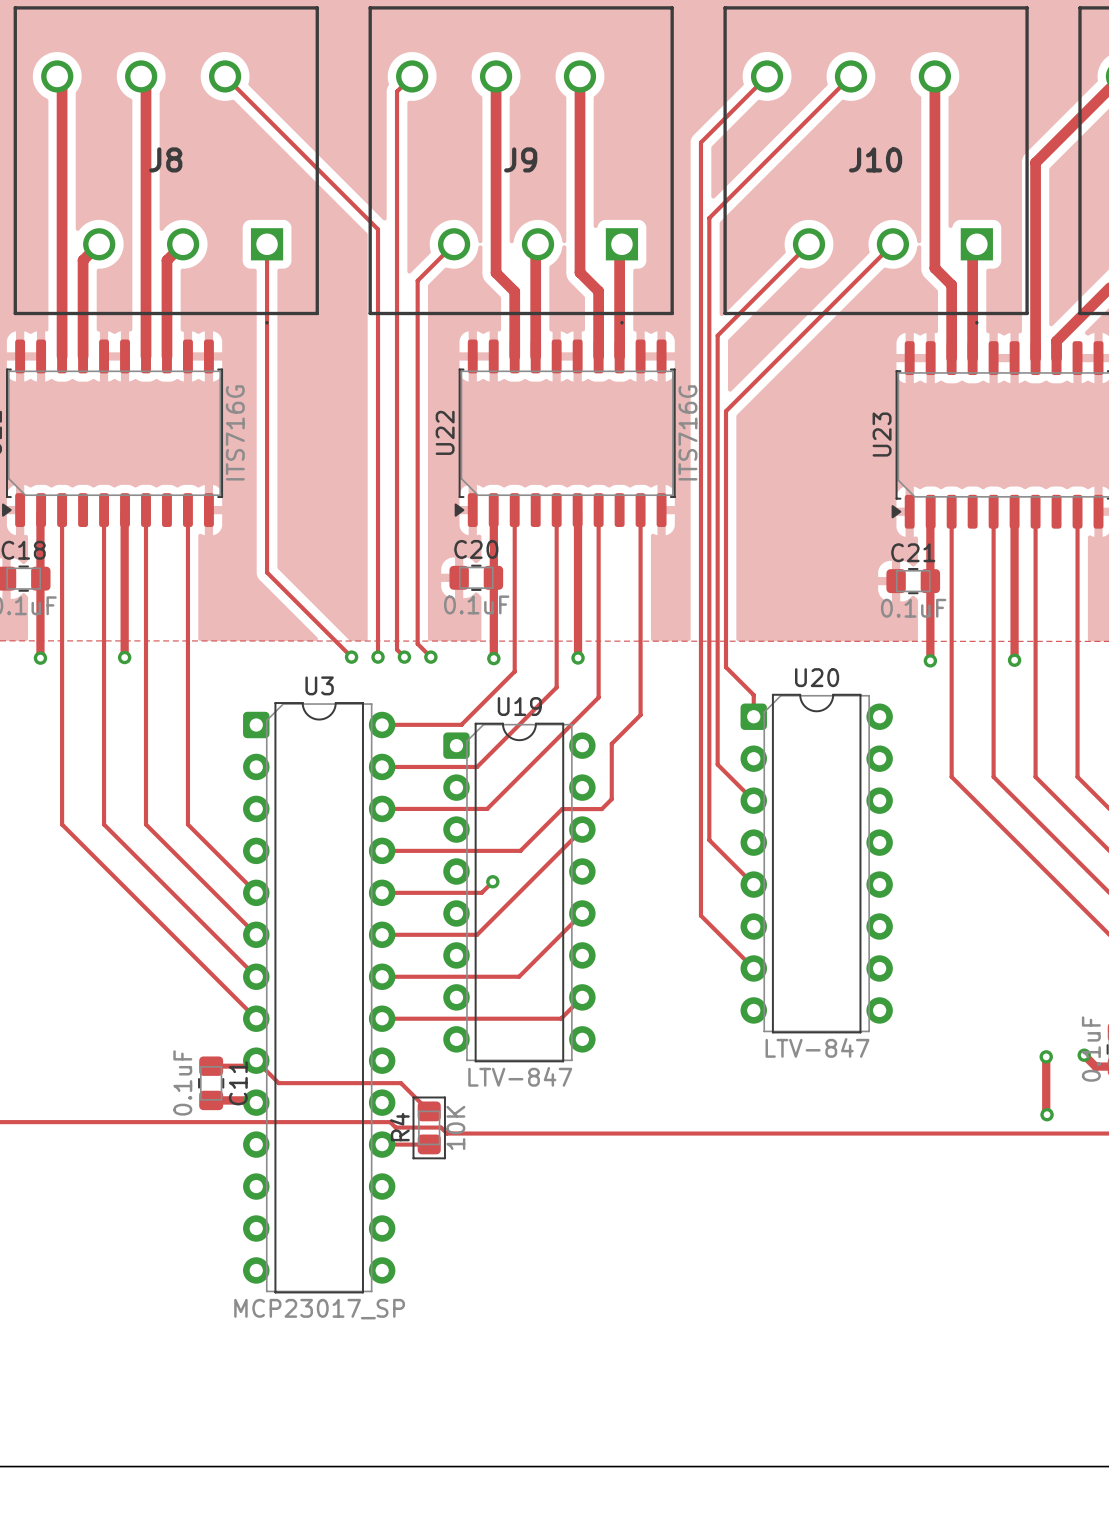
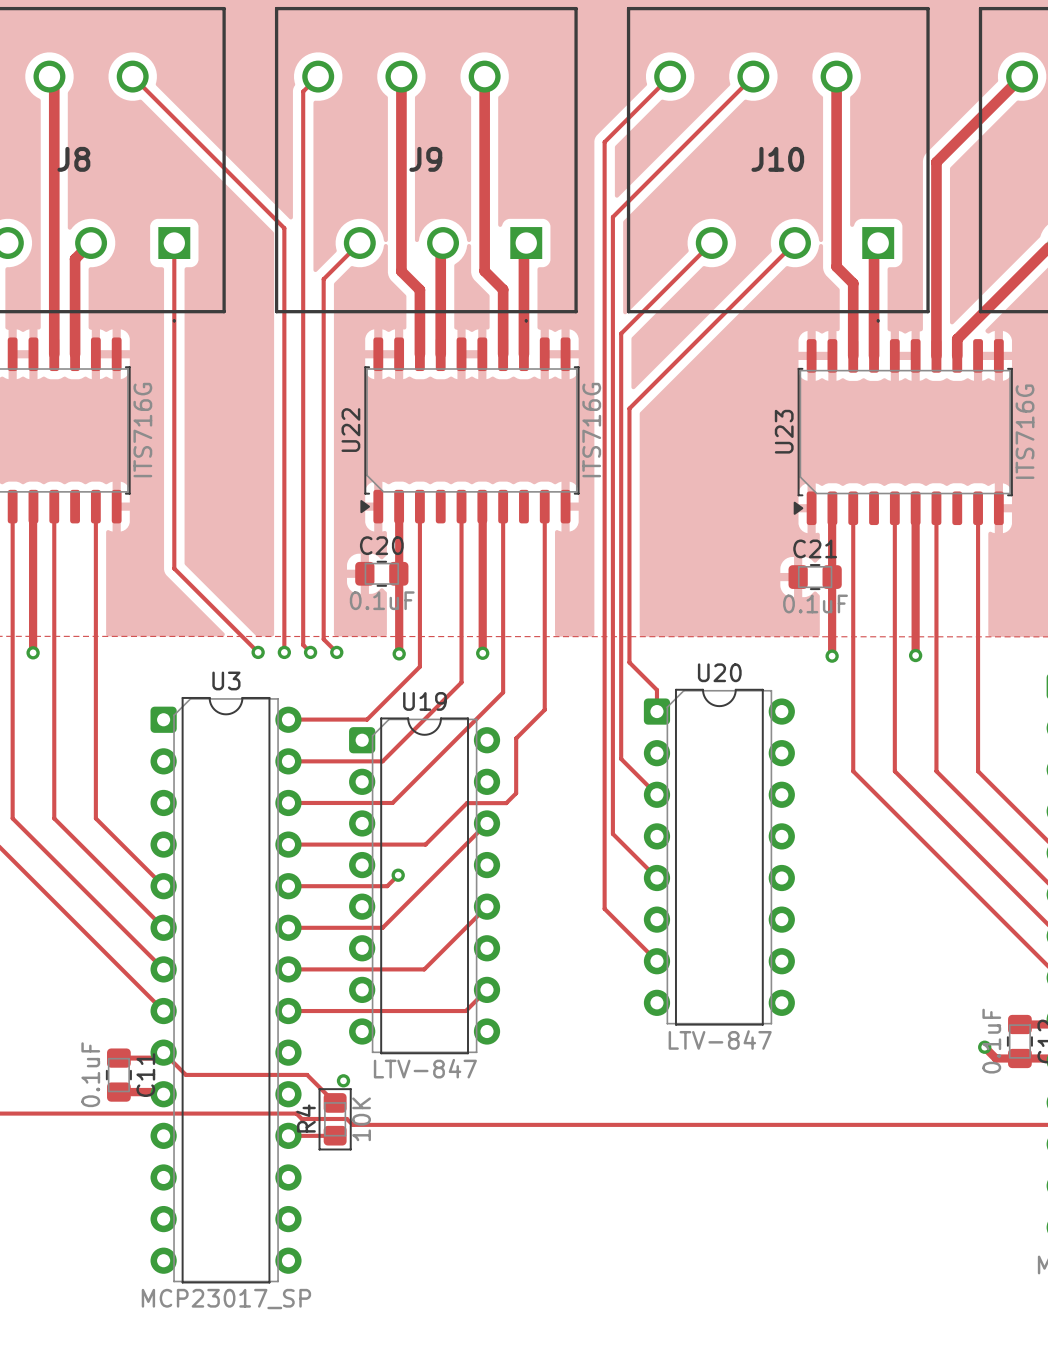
track: (1046, 1056) (1047, 1114) -> none
via: (1046, 1056) -> none
via: none -> (343, 1080)
via: (1047, 1114) -> none

